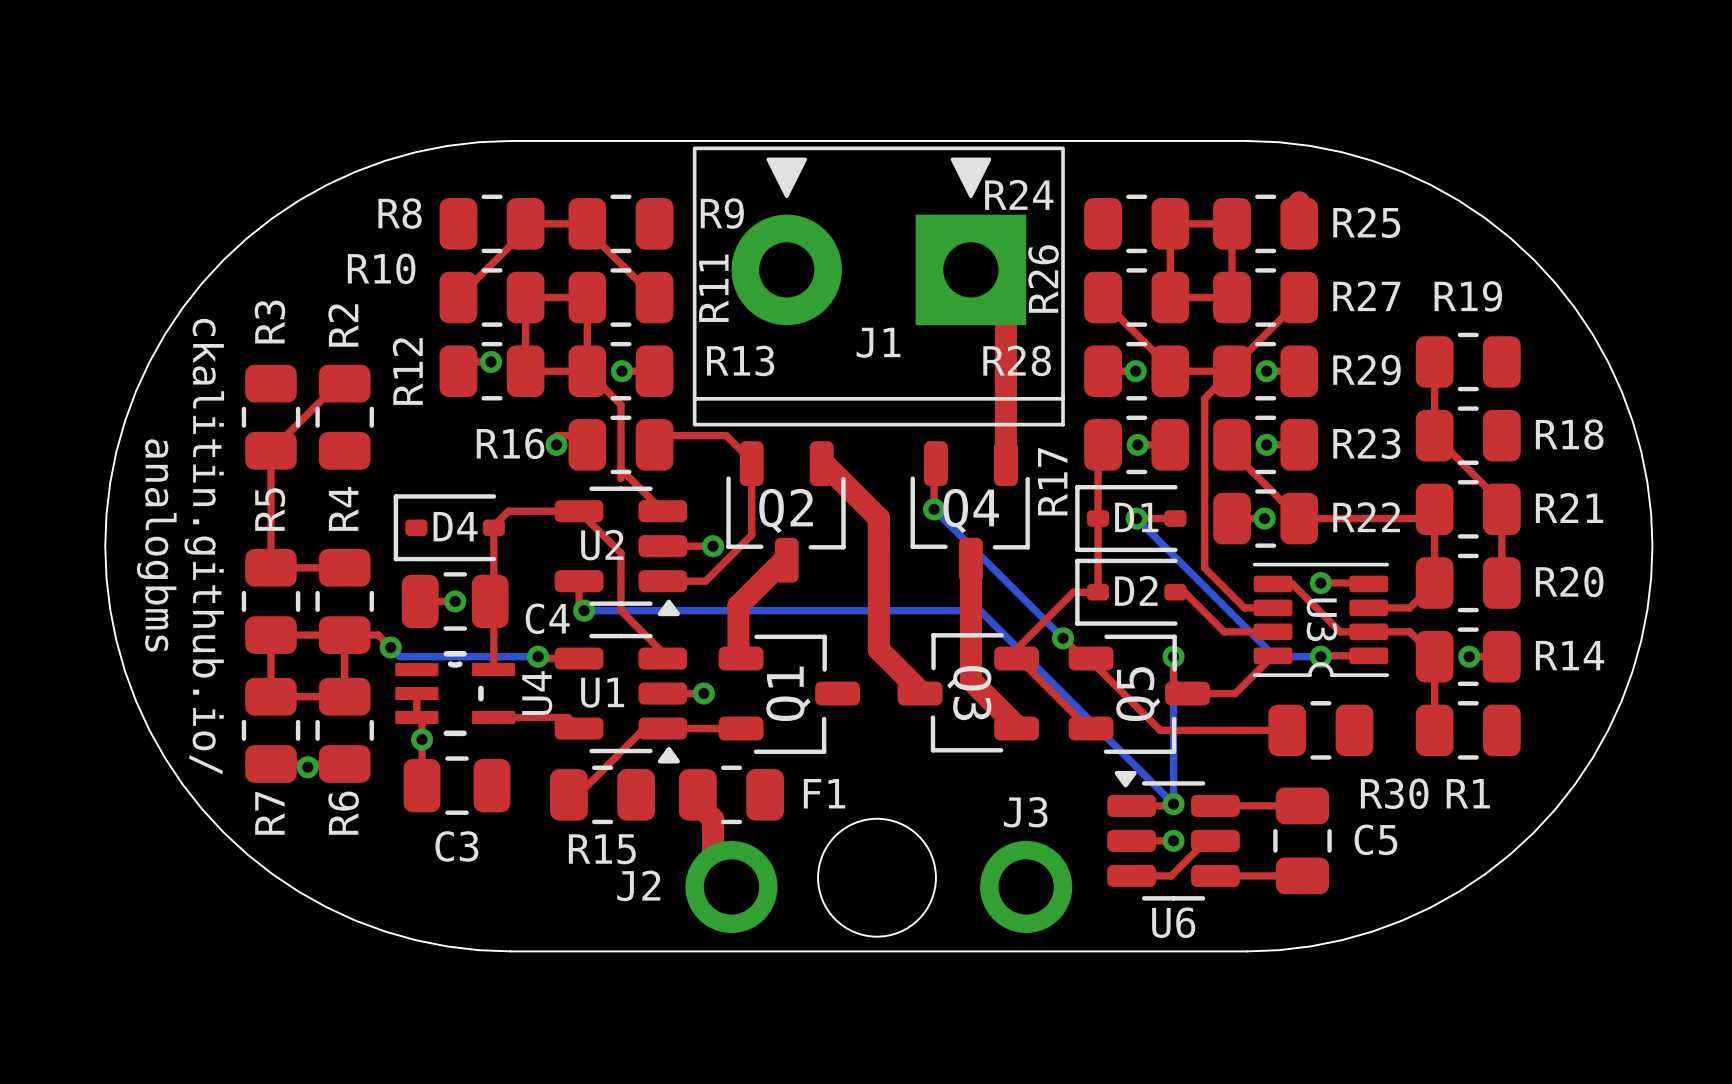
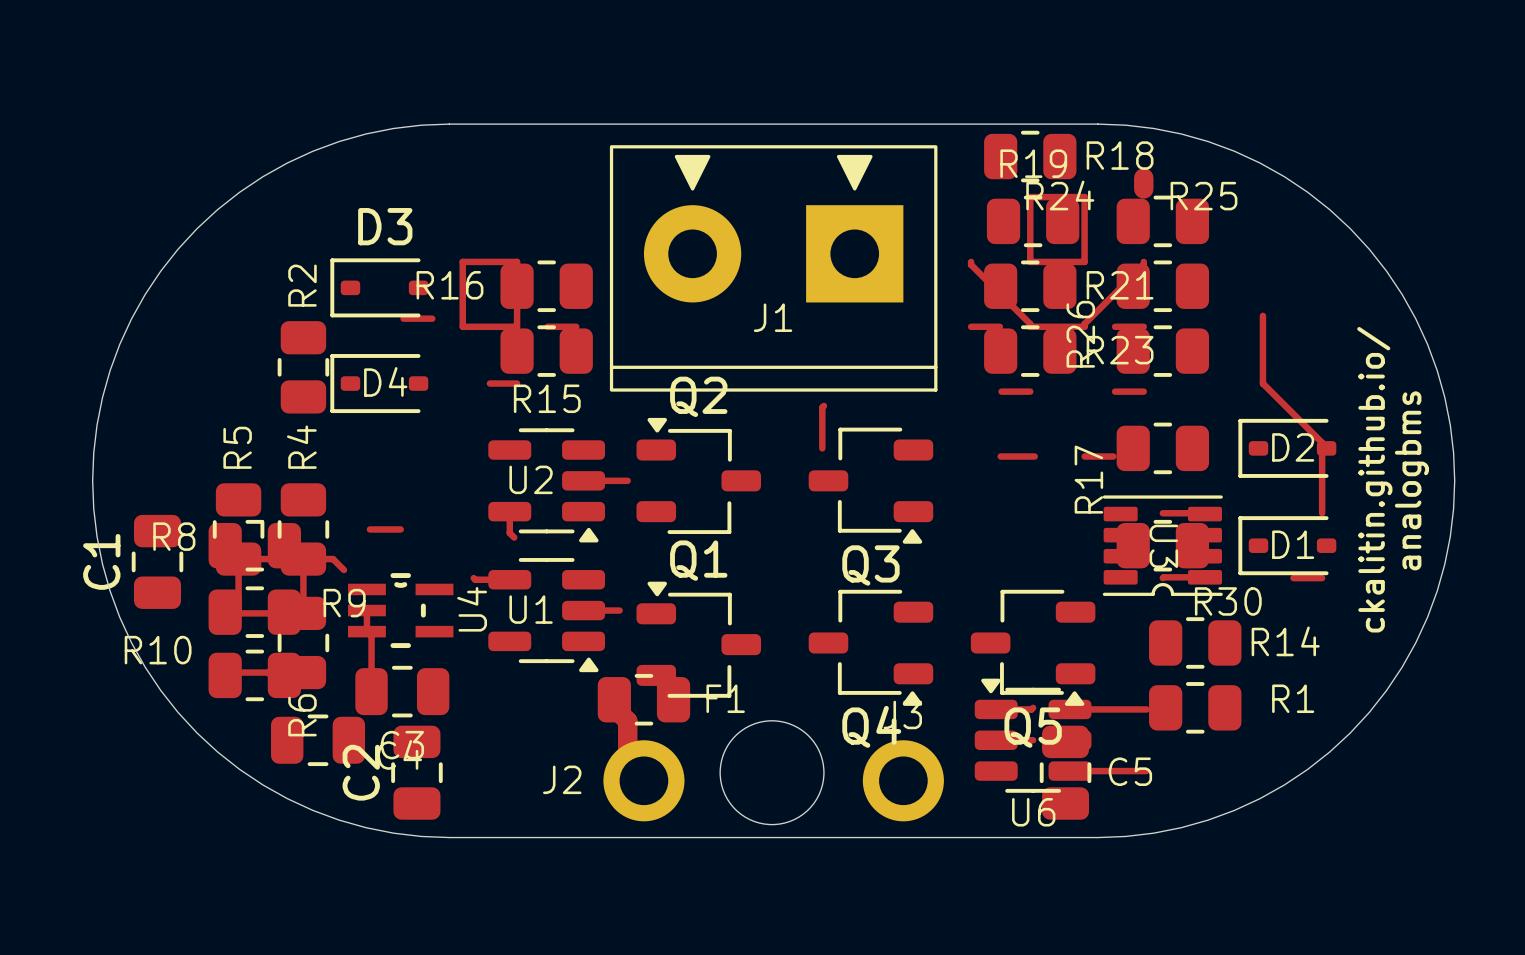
R8 position: (492, 223) -> (254, 545)
R9 position: (620, 223) -> (254, 612)
R24 position: (1136, 223) -> (1162, 221)
R25 position: (1265, 223) -> (1162, 286)
top track: (970, 269) (1005, 304) (1005, 461) -> none
J1 position: (878, 286) -> (773, 268)
top track: (458, 297) (525, 230) (525, 223) (587, 223) (587, 230) (654, 297) -> none
R10 position: (492, 297) -> (254, 675)
R11: (620, 297) -> none
R26 position: (1136, 297) -> (1162, 351)
R27: (1265, 297) -> none
D3: none -> (379, 287)
via: (491, 362) -> none
R19 position: (1468, 362) -> (1033, 221)
R12: (492, 371) -> none
top track: (587, 371) (620, 404) (620, 478) -> none
R13: (620, 371) -> none
via: (621, 371) -> none
via: (1135, 371) -> none
R28: (1136, 371) -> none
top track: (1232, 371) (1204, 398) (1204, 568) (1244, 607) (1273, 607) -> none
R29: (1265, 371) -> none
via: (1266, 371) -> none
top track: (344, 383) (338, 383) (271, 450) (271, 567) (344, 567) -> none
R3: (271, 417) -> none
top track: (1098, 422) (1098, 592) (1073, 592) (1019, 646) (1019, 659) (1088, 728) -> none
top track: (654, 435) (726, 435) (751, 461) -> none
R18 position: (1468, 435) -> (1030, 156)
Q2 footprint: [726, 441, 846, 583] -> [636, 417, 762, 535]
Q4 footprint: [910, 441, 1030, 583] -> [808, 589, 934, 706]
via: (556, 444) -> none
R16 position: (620, 444) -> (546, 286)
R17 position: (1136, 444) -> (1162, 448)
via: (1137, 444) -> none
top track: (1232, 444) (1232, 451) (1299, 518) (1422, 518) (1434, 506) (1434, 583) (1409, 607) (1368, 607) -> none
R23 position: (1265, 444) -> (1030, 351)
via: (1266, 444) -> none
top track: (821, 461) (878, 518) (878, 649) (922, 693) -> none
top track: (751, 463) (751, 535) (705, 581) (662, 581) -> none
top track: (620, 469) (662, 511) -> none
bottom track: (934, 509) (1063, 638) -> none
via: (934, 509) -> none
R21 position: (1468, 509) -> (1030, 286)
Q2 name position: Q2 (786, 510) -> Q2 (698, 396)
Q4 name position: Q4 (971, 510) -> Q4 (871, 726)
D1 position: (1130, 518) -> (1287, 545)
bottom track: (1136, 518) (1274, 656) (1320, 656) -> none
via: (1136, 518) -> none
via: (1264, 518) -> none
R22: (1265, 518) -> none
D4 position: (449, 527) -> (379, 383)
text: analogbms (156, 545) -> none
text: none -> ckalitin.github.io/ (1374, 479)
text: ckalitin.github.io/ (204, 546) -> none
via: (713, 546) -> none
text: none -> analogbms (1411, 480)
top track: (786, 557) (738, 605) (738, 658) -> none
top track: (970, 557) (970, 680) (1019, 728) -> none
top track: (1273, 583) (1292, 583) (1340, 631) (1409, 631) (1434, 656) (1434, 727) -> none
via: (1320, 583) -> none
R20: (1468, 583) -> none
D2 position: (1130, 592) -> (1287, 448)
top track: (1175, 592) (1184, 592) (1224, 631) (1273, 631) -> none
C4 position: (455, 601) -> (318, 740)
via: (455, 601) -> none
bottom track: (584, 610) (980, 610) (1173, 804) (1172, 657) -> none
via: (584, 610) -> none
Q3 footprint: [897, 633, 1040, 753] -> [808, 427, 934, 544]
Q1 footprint: [718, 634, 861, 754] -> [636, 581, 762, 698]
Q5 footprint: [1068, 634, 1211, 754] -> [970, 589, 1096, 706]
C1: none -> (157, 561)
top track: (1063, 638) (1083, 658) (1088, 658) (1160, 730) (1287, 730) -> none
via: (1063, 638) -> none
bottom track: (390, 647) (399, 656) (538, 656) -> none
via: (390, 647) -> none
top track: (1273, 655) (1235, 693) (1184, 693) (1173, 682) (1173, 656) -> none
via: (538, 656) -> none
via: (1173, 656) -> none
via: (1320, 656) -> none
R14 position: (1468, 656) -> (1195, 642)
via: (1469, 656) -> none
top track: (662, 658) (662, 652) (620, 610) (620, 553) (579, 511) (508, 511) (493, 525) (493, 669) -> none
via: (703, 693) -> none
Q1 name position: Q1 (788, 693) -> Q1 (698, 560)
Q3 name position: Q3 (969, 693) -> Q3 (870, 565)
Q5 name position: Q5 (1138, 694) -> Q5 (1033, 727)
top track: (493, 717) (568, 717) (579, 728) -> none
top track: (741, 728) (644, 728) (568, 804) -> none
R7: (271, 730) -> none
R30 position: (1320, 730) -> (1162, 545)
R1 position: (1468, 730) -> (1195, 707)
via: (422, 739) -> none
via: (307, 767) -> none
R15 position: (602, 794) -> (546, 351)
via: (1173, 804) -> none
via: (1173, 840) -> none
top track: (1215, 840) (1206, 840) (1171, 875) (1131, 875) -> none
C5 position: (1302, 840) -> (1065, 772)
C2: none -> (416, 772)

